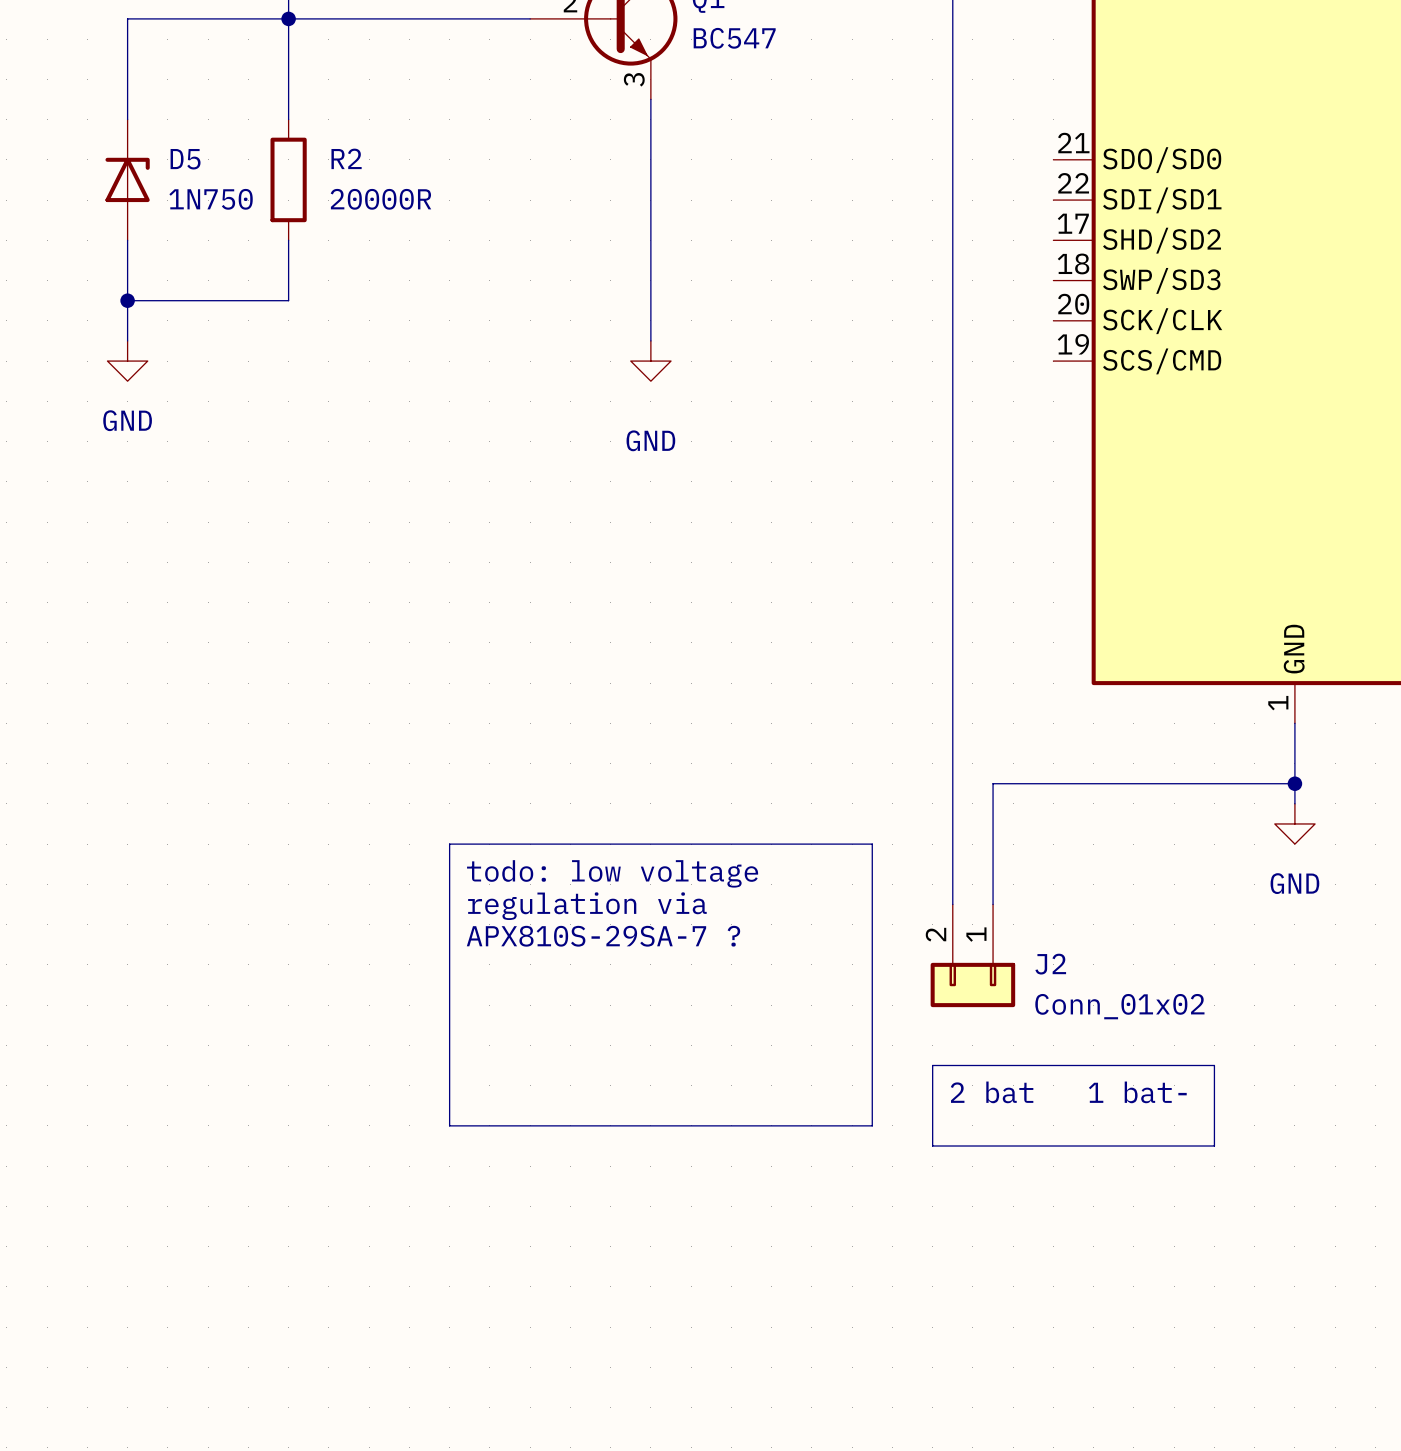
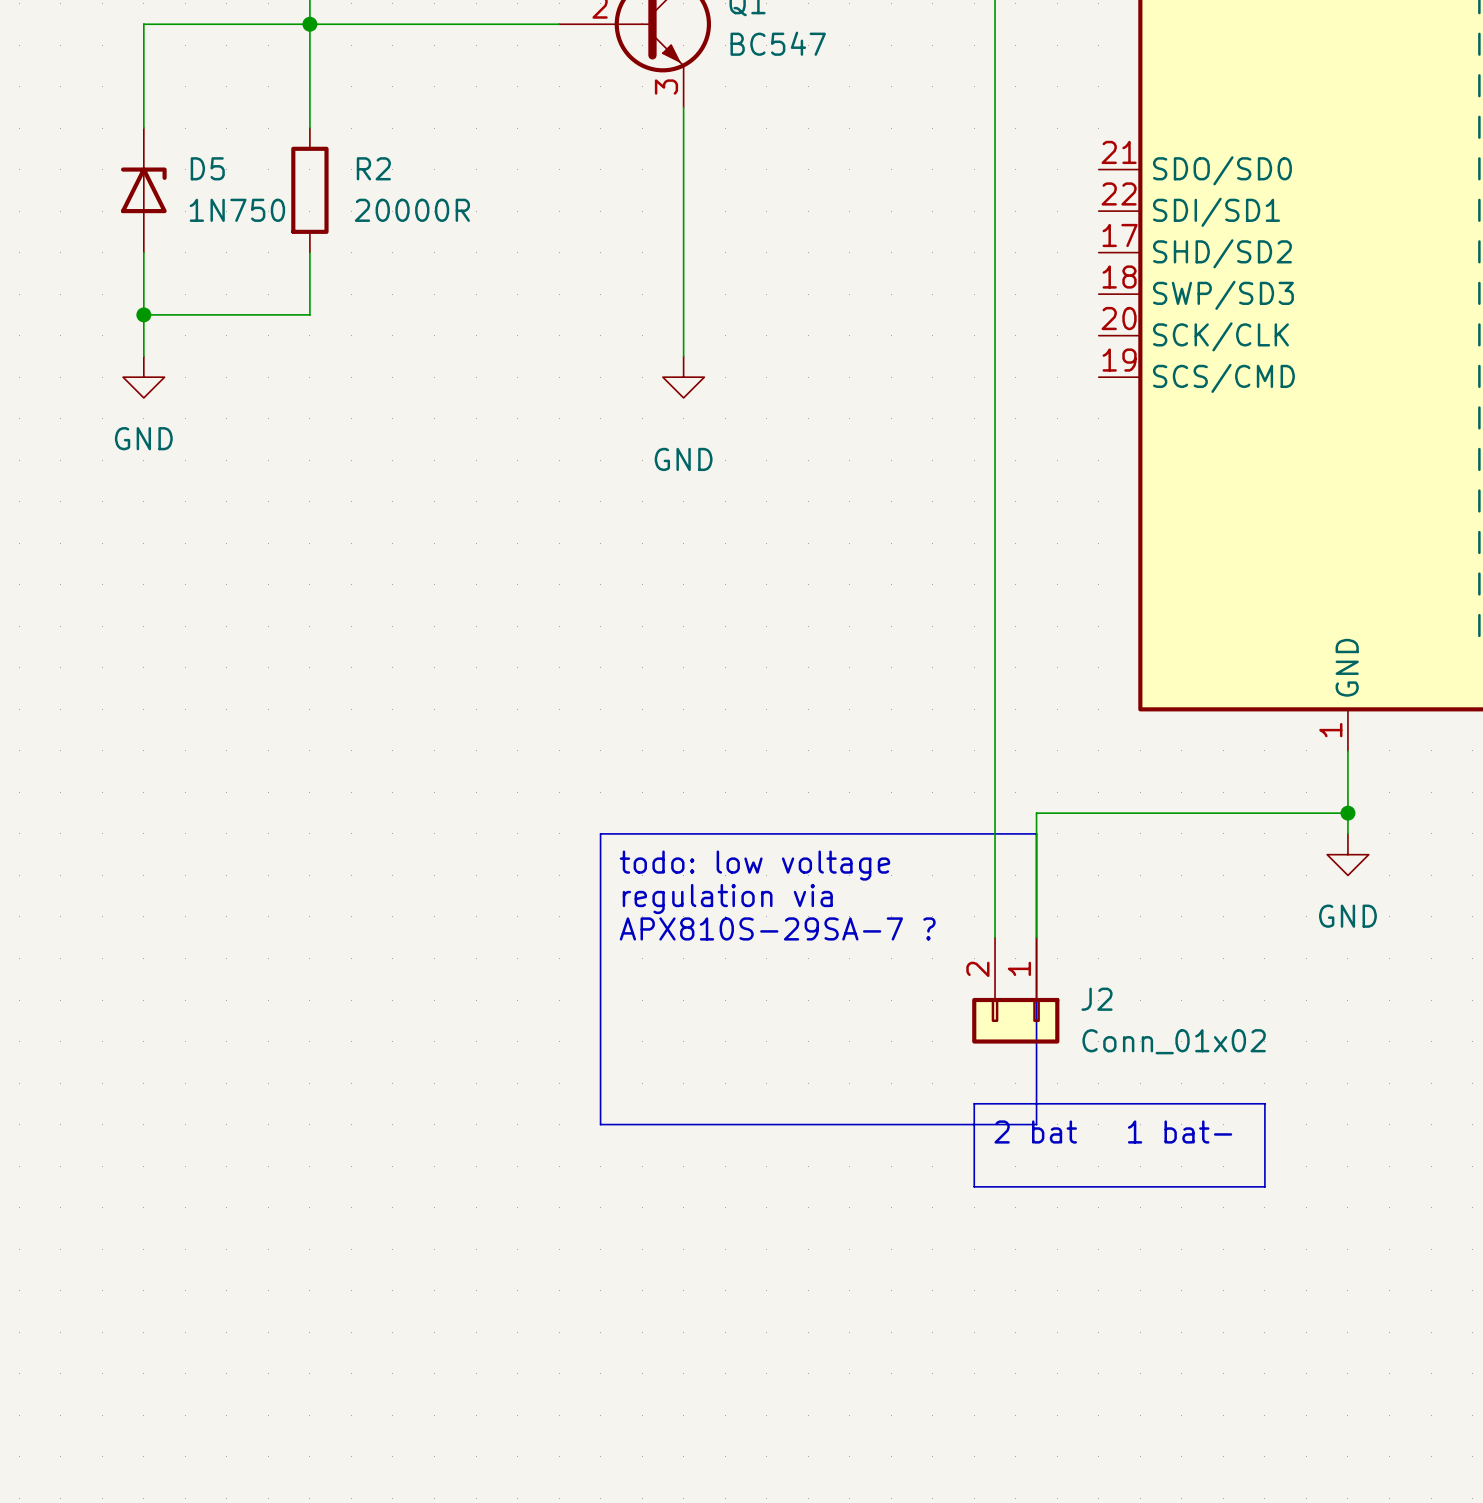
line: (449, 844) (872, 844) (872, 1125) (449, 1125) (449, 844) -> (600, 833) (1036, 833) (1036, 1124) (600, 1124) (600, 833)
text position: todo: low voltage (612, 873) -> todo: low voltage (754, 865)
text position: regulation via (587, 906) -> regulation via (727, 898)
text position: APX810S-29SA-7 ? (603, 936) -> APX810S-29SA-7 ? (777, 928)

